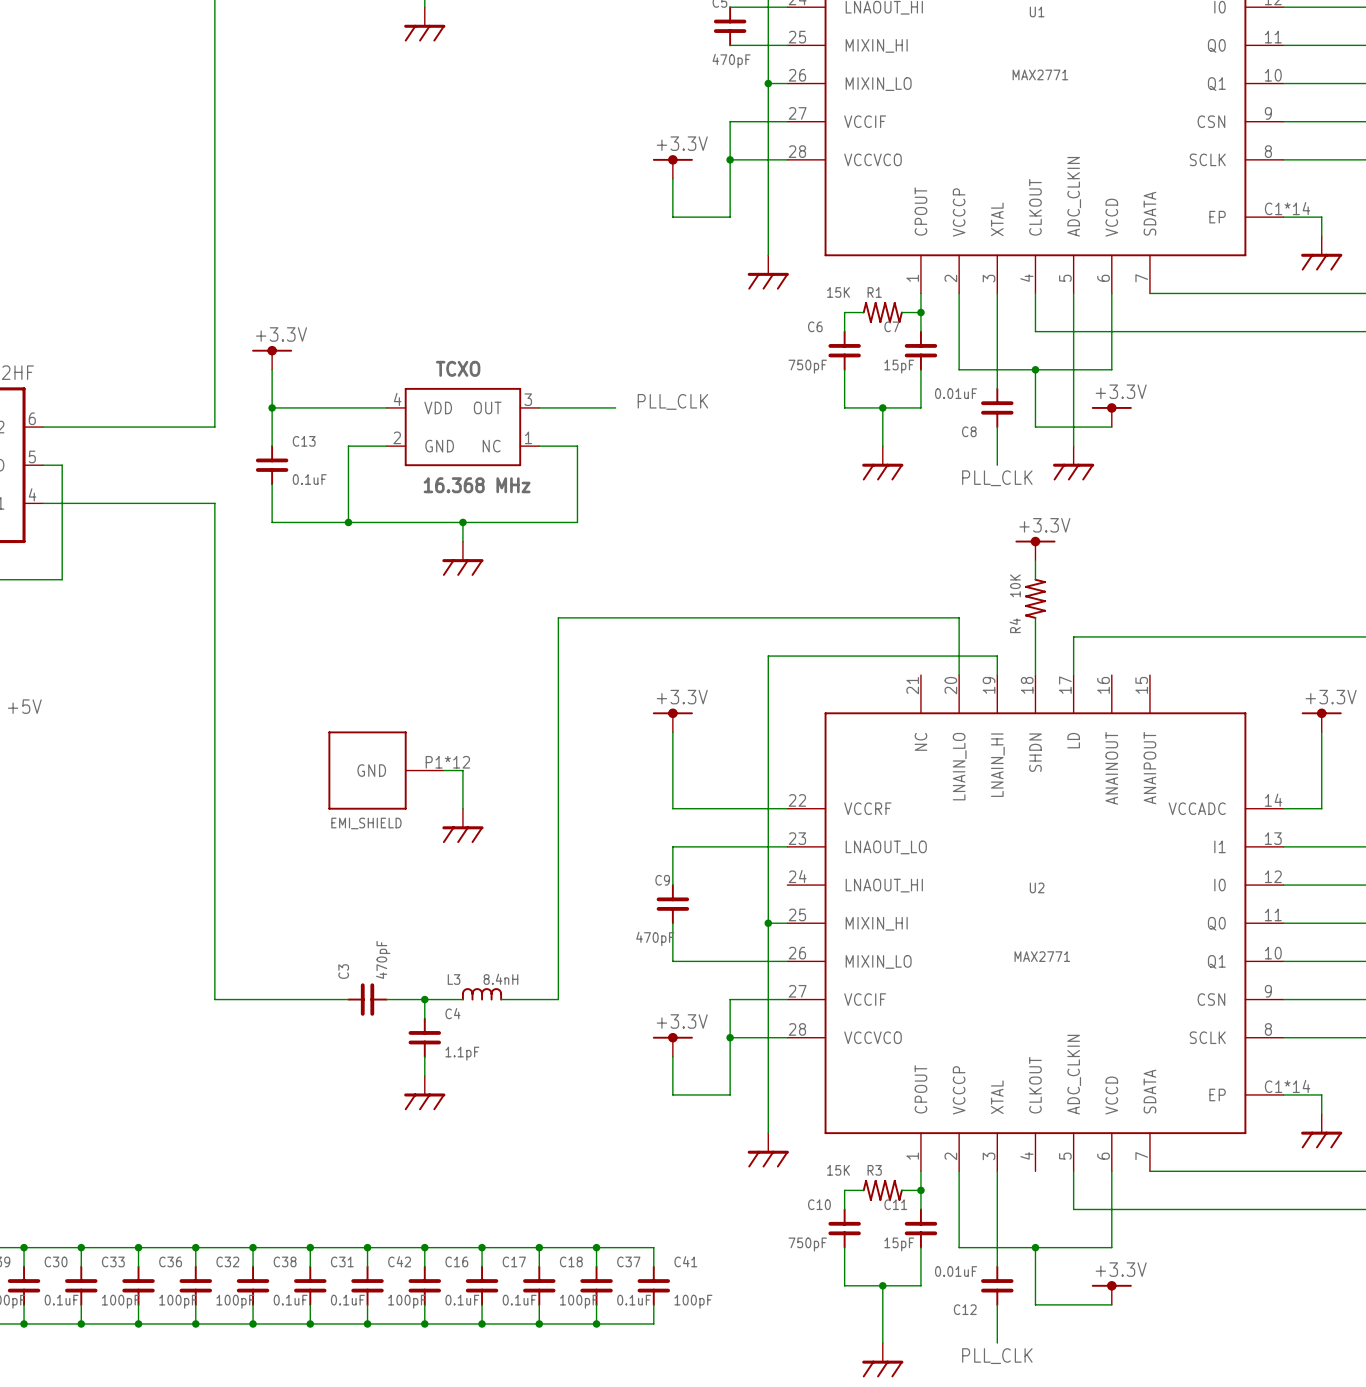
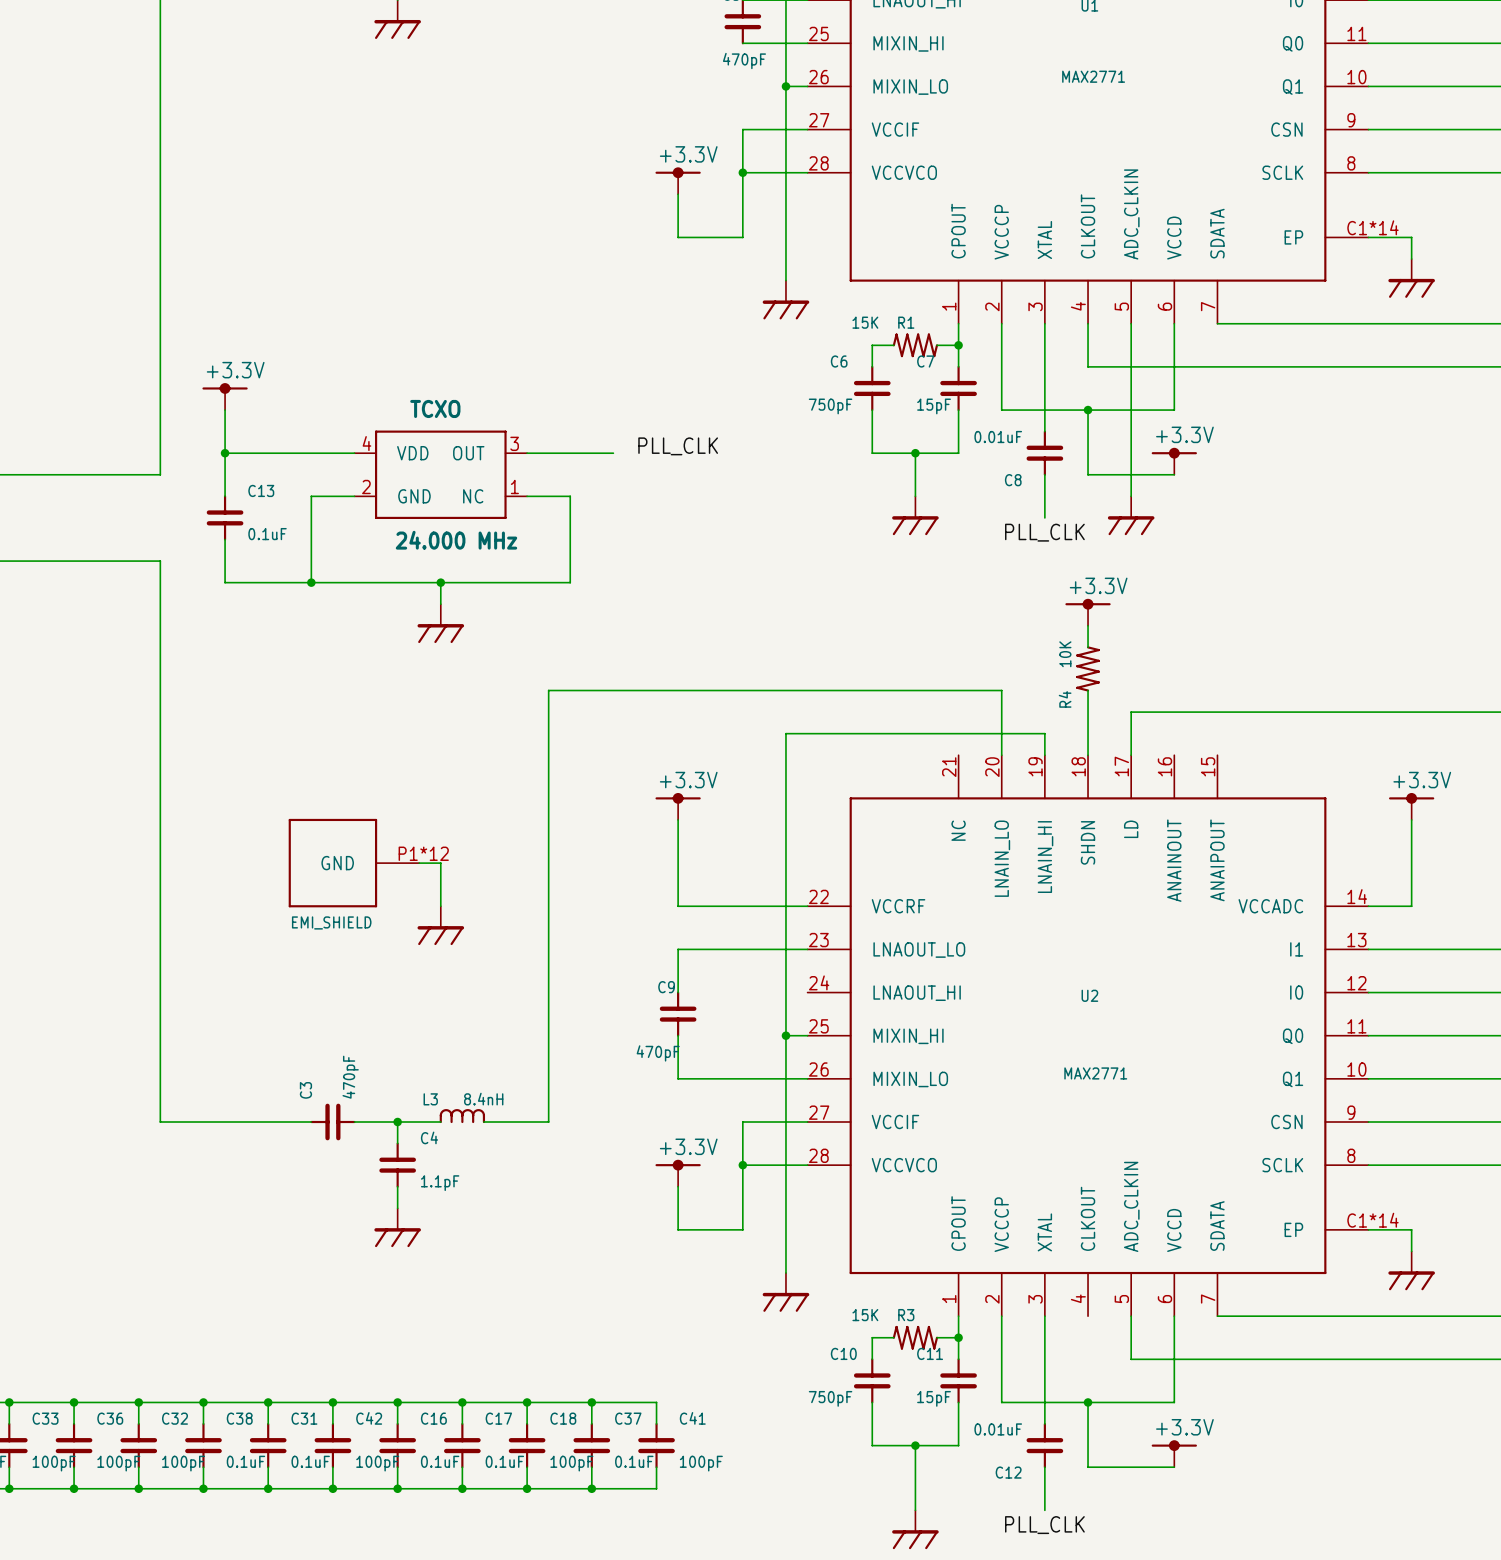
TCXO value: 16.368 MHz (477, 485) -> 24.000 MHz (456, 540)

